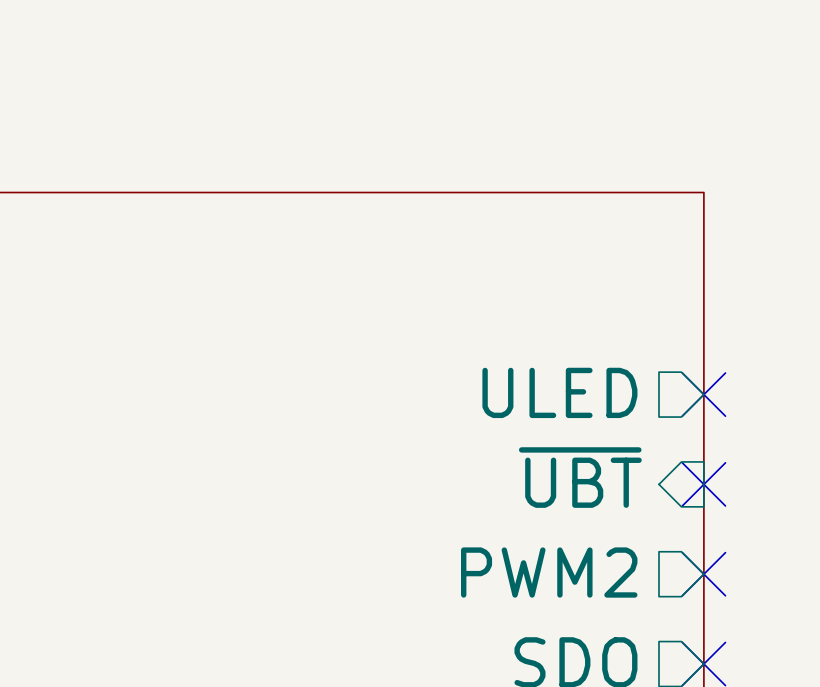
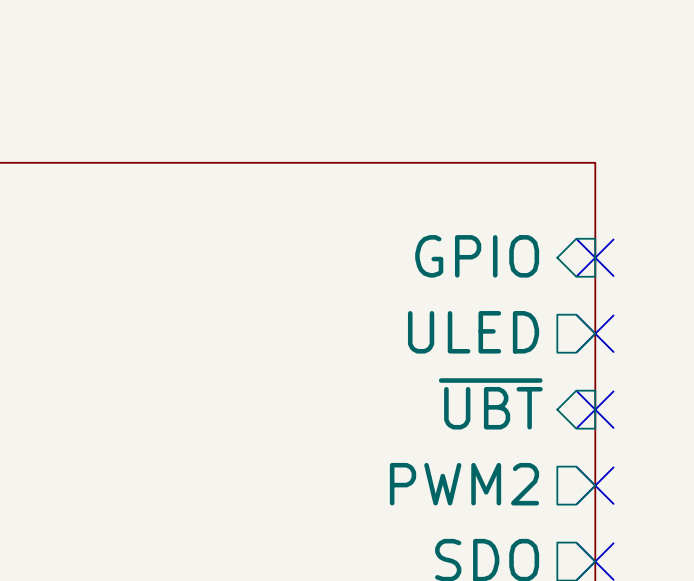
sheet pin: none -> GPIO (477, 256)
no-connect mark: none -> (595, 257)

